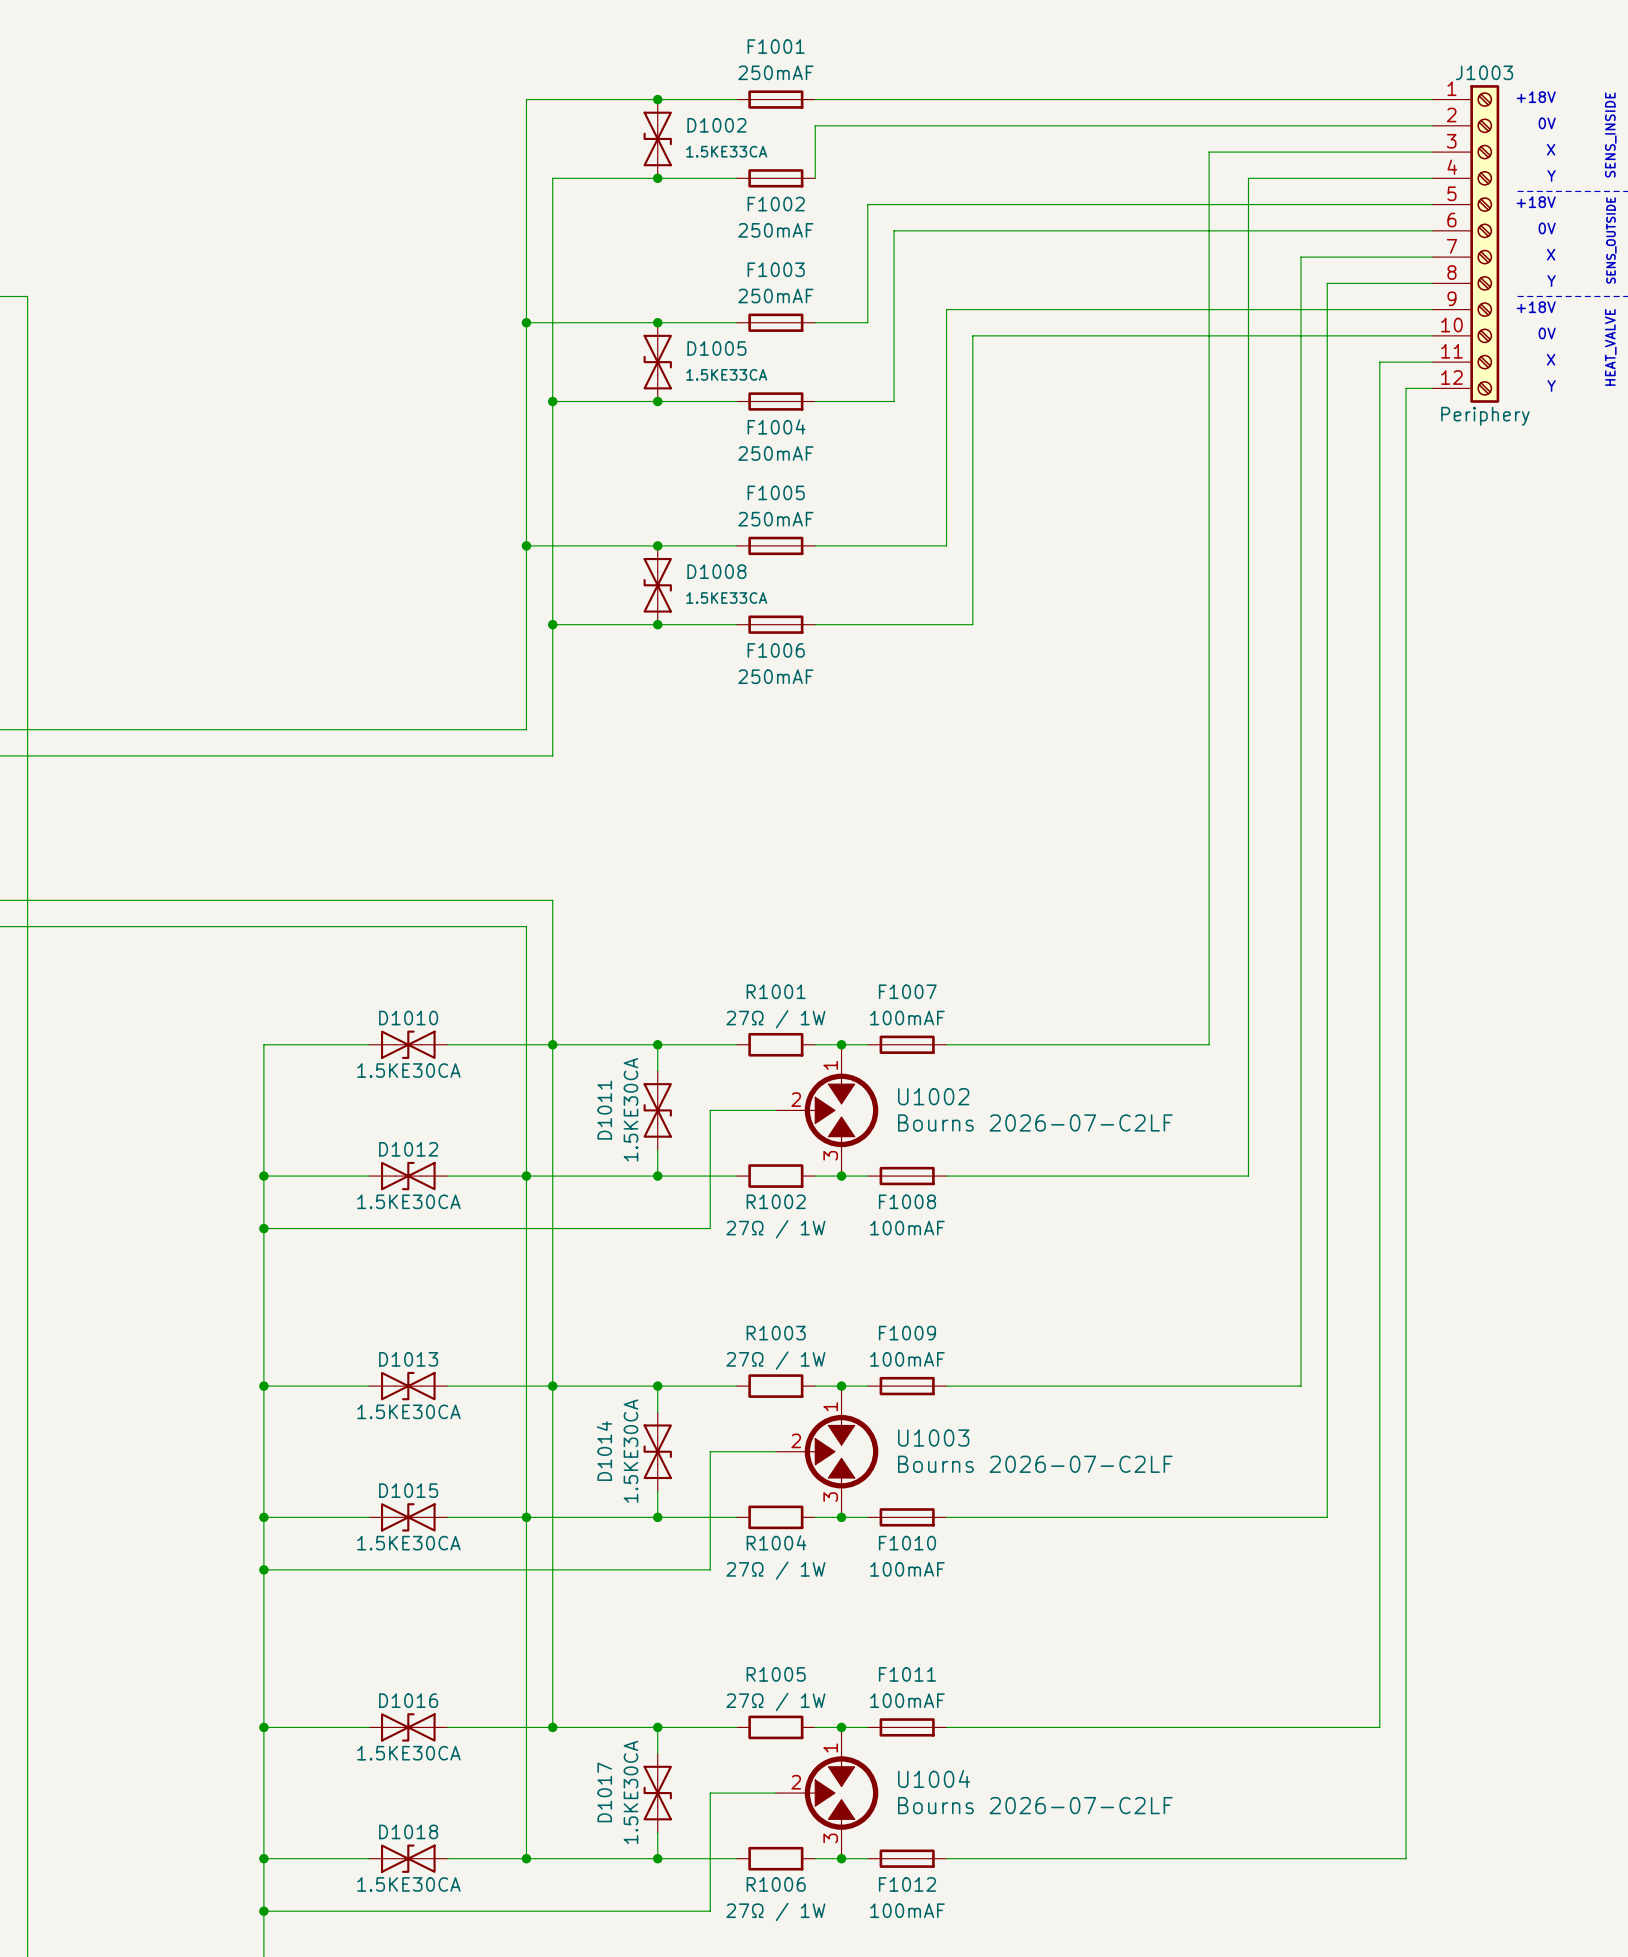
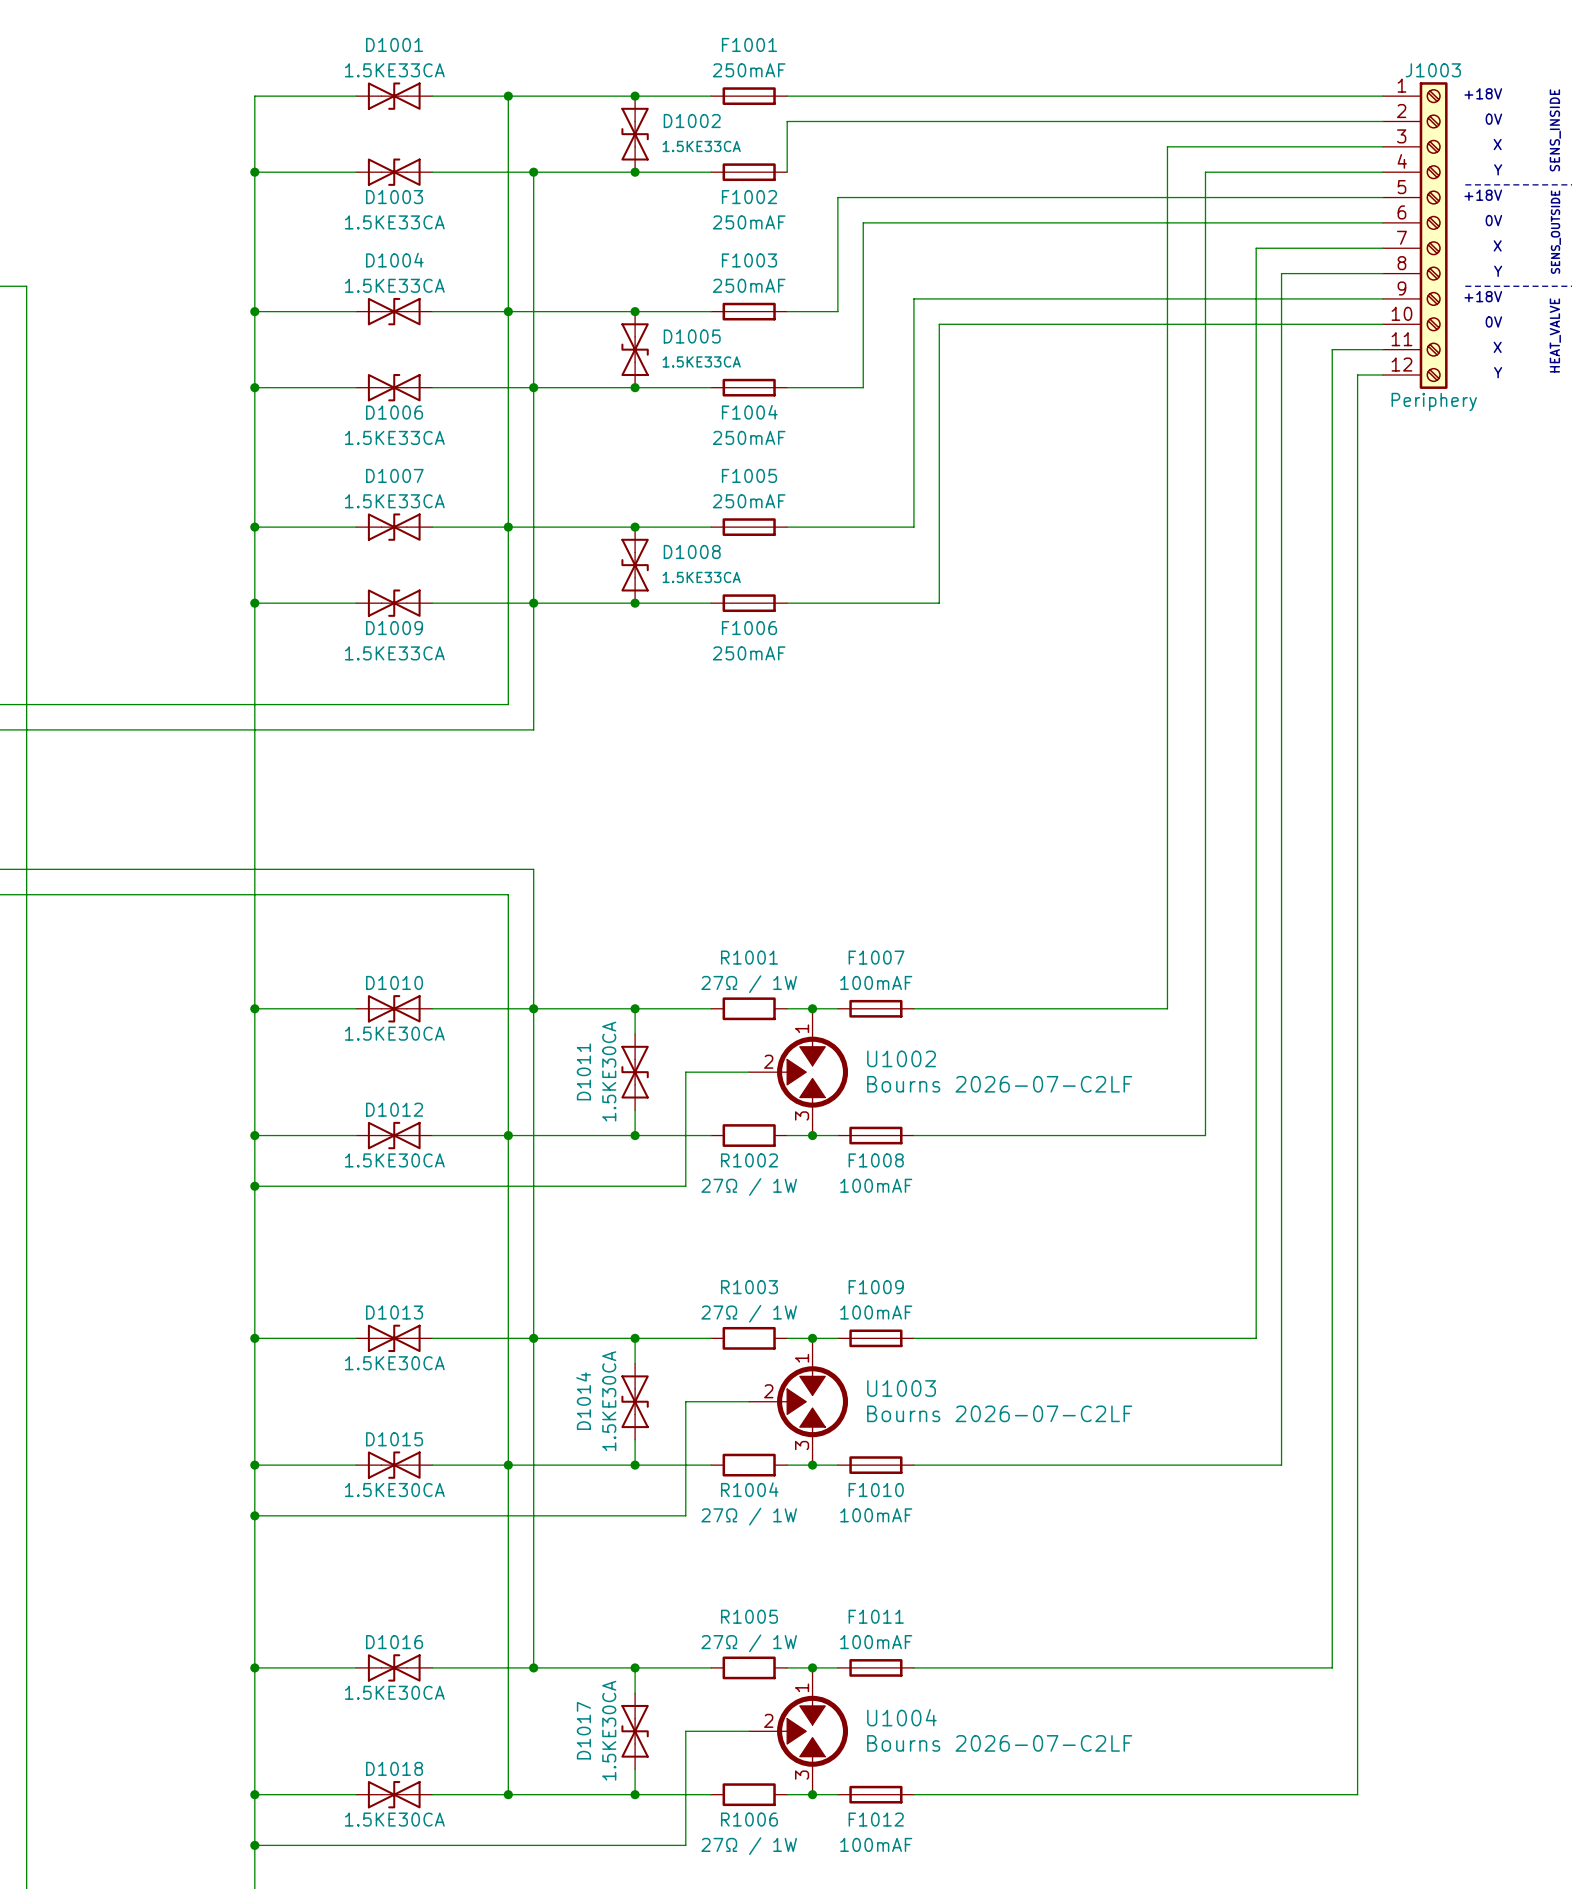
wire: none -> (356, 96) (254, 96) (254, 1008)
D1001: none -> 1.5KE33CA (394, 96)
wire: none -> (432, 96) (508, 96)
junction: none -> (508, 96)
wire: none -> (254, 172) (356, 172)
junction: none -> (254, 172)
D1003: none -> 1.5KE33CA (394, 172)
wire: none -> (432, 172) (533, 172)
junction: none -> (533, 172)
wire: none -> (254, 311) (356, 311)
junction: none -> (254, 311)
D1004: none -> 1.5KE33CA (394, 311)
wire: none -> (432, 311) (508, 311)
wire: none -> (254, 387) (356, 387)
junction: none -> (254, 387)
D1006: none -> 1.5KE33CA (394, 387)
wire: none -> (432, 387) (533, 387)
wire: none -> (254, 527) (356, 527)
junction: none -> (254, 527)
D1007: none -> 1.5KE33CA (394, 527)
wire: none -> (432, 527) (508, 527)
wire: none -> (254, 603) (356, 603)
junction: none -> (254, 603)
D1009: none -> 1.5KE33CA (394, 603)
wire: none -> (432, 603) (533, 603)
junction: none -> (254, 1008)

